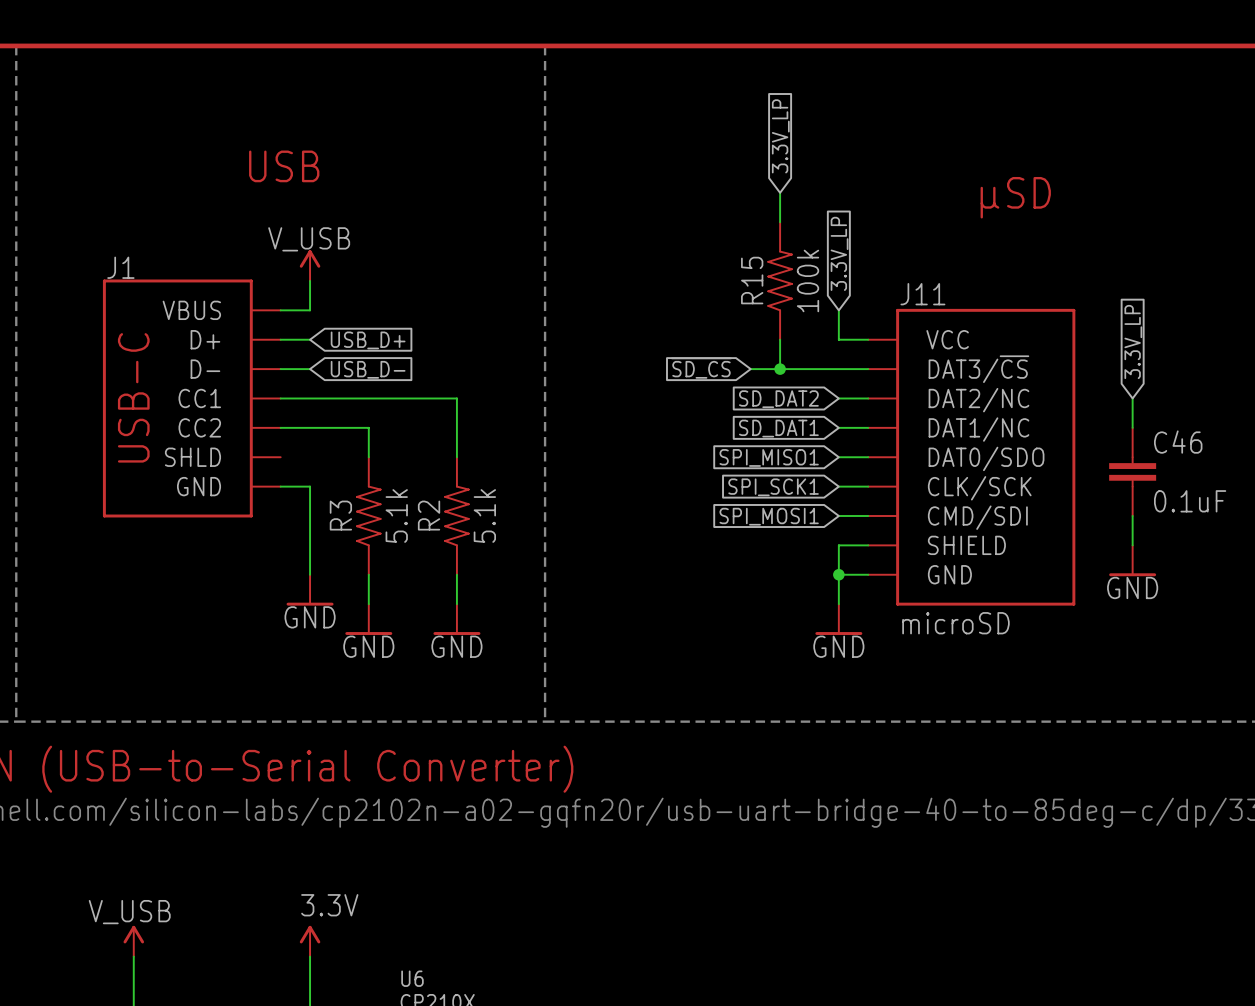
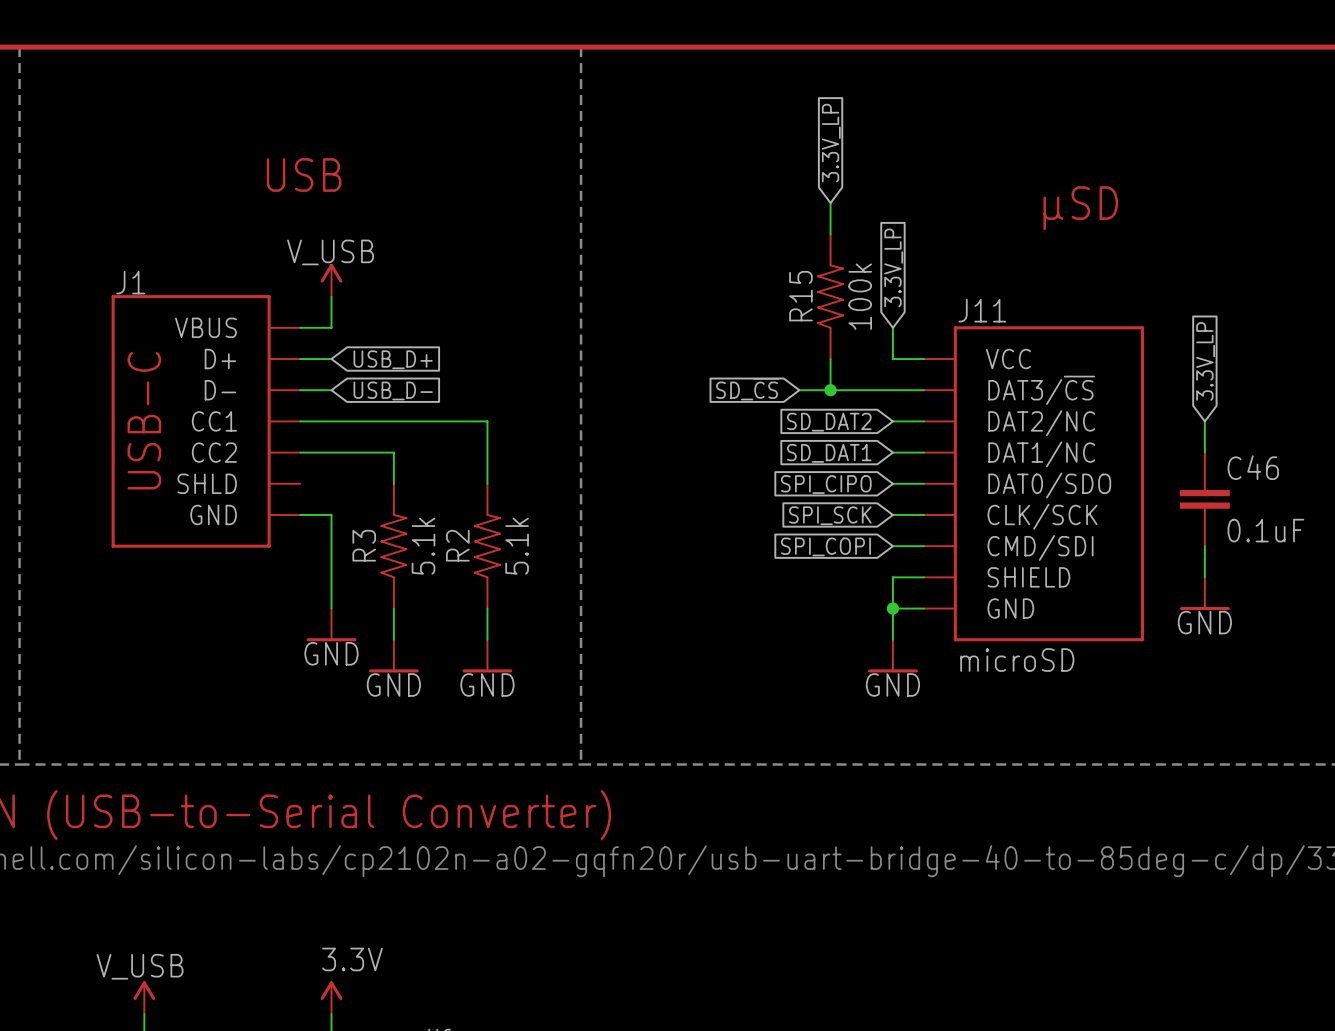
global label: ~{SD_CS} (701, 368) -> SD_~{CS} (747, 389)
global label: SPI_MISO1 (769, 457) -> SPI_CIPO (826, 484)
global label: SPI_SCK1 (773, 487) -> SPI_SCK (830, 515)
global label: SPI_MOSI1 (769, 516) -> SPI_COPI (825, 546)

